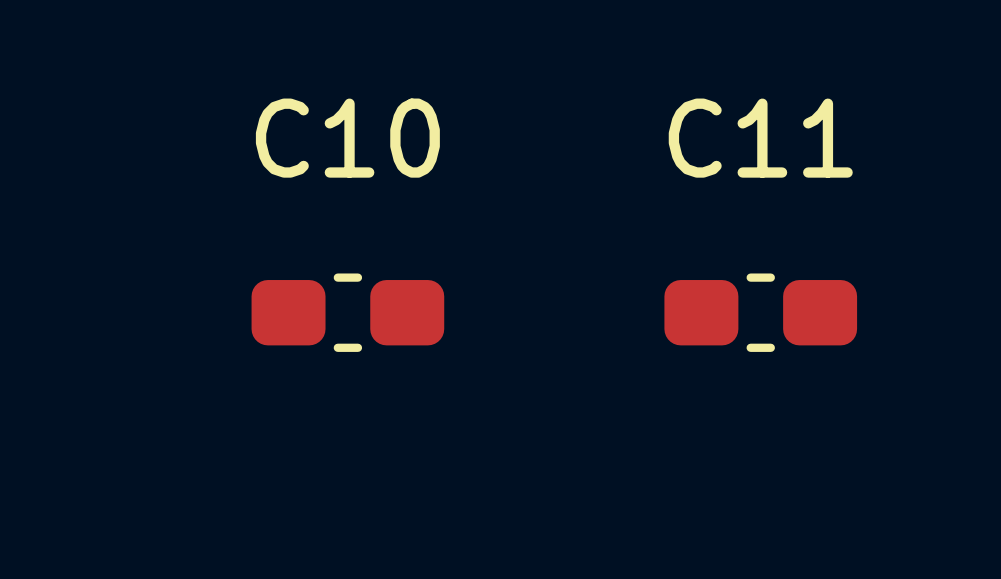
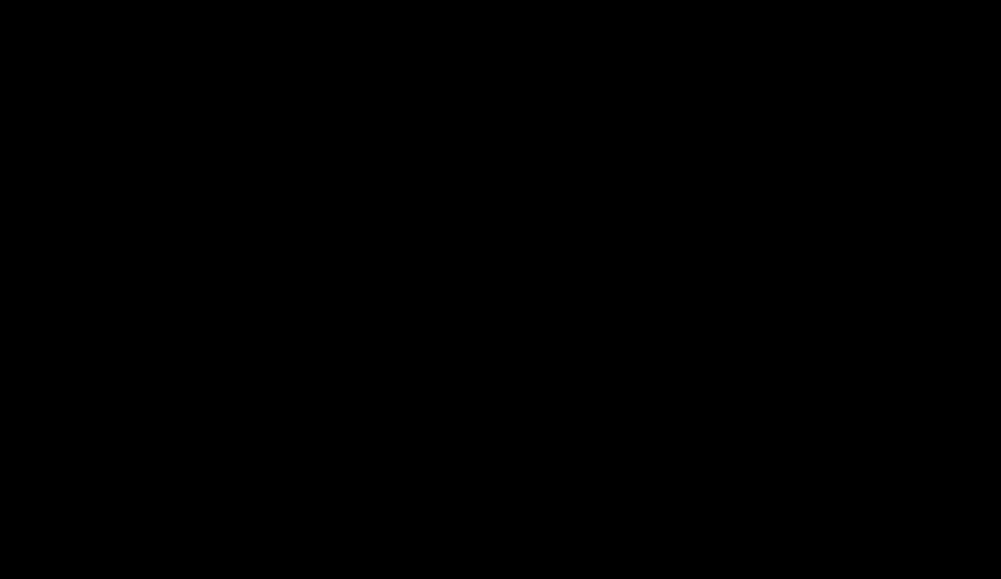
C10: (347, 312) -> none
C11: (760, 312) -> none

